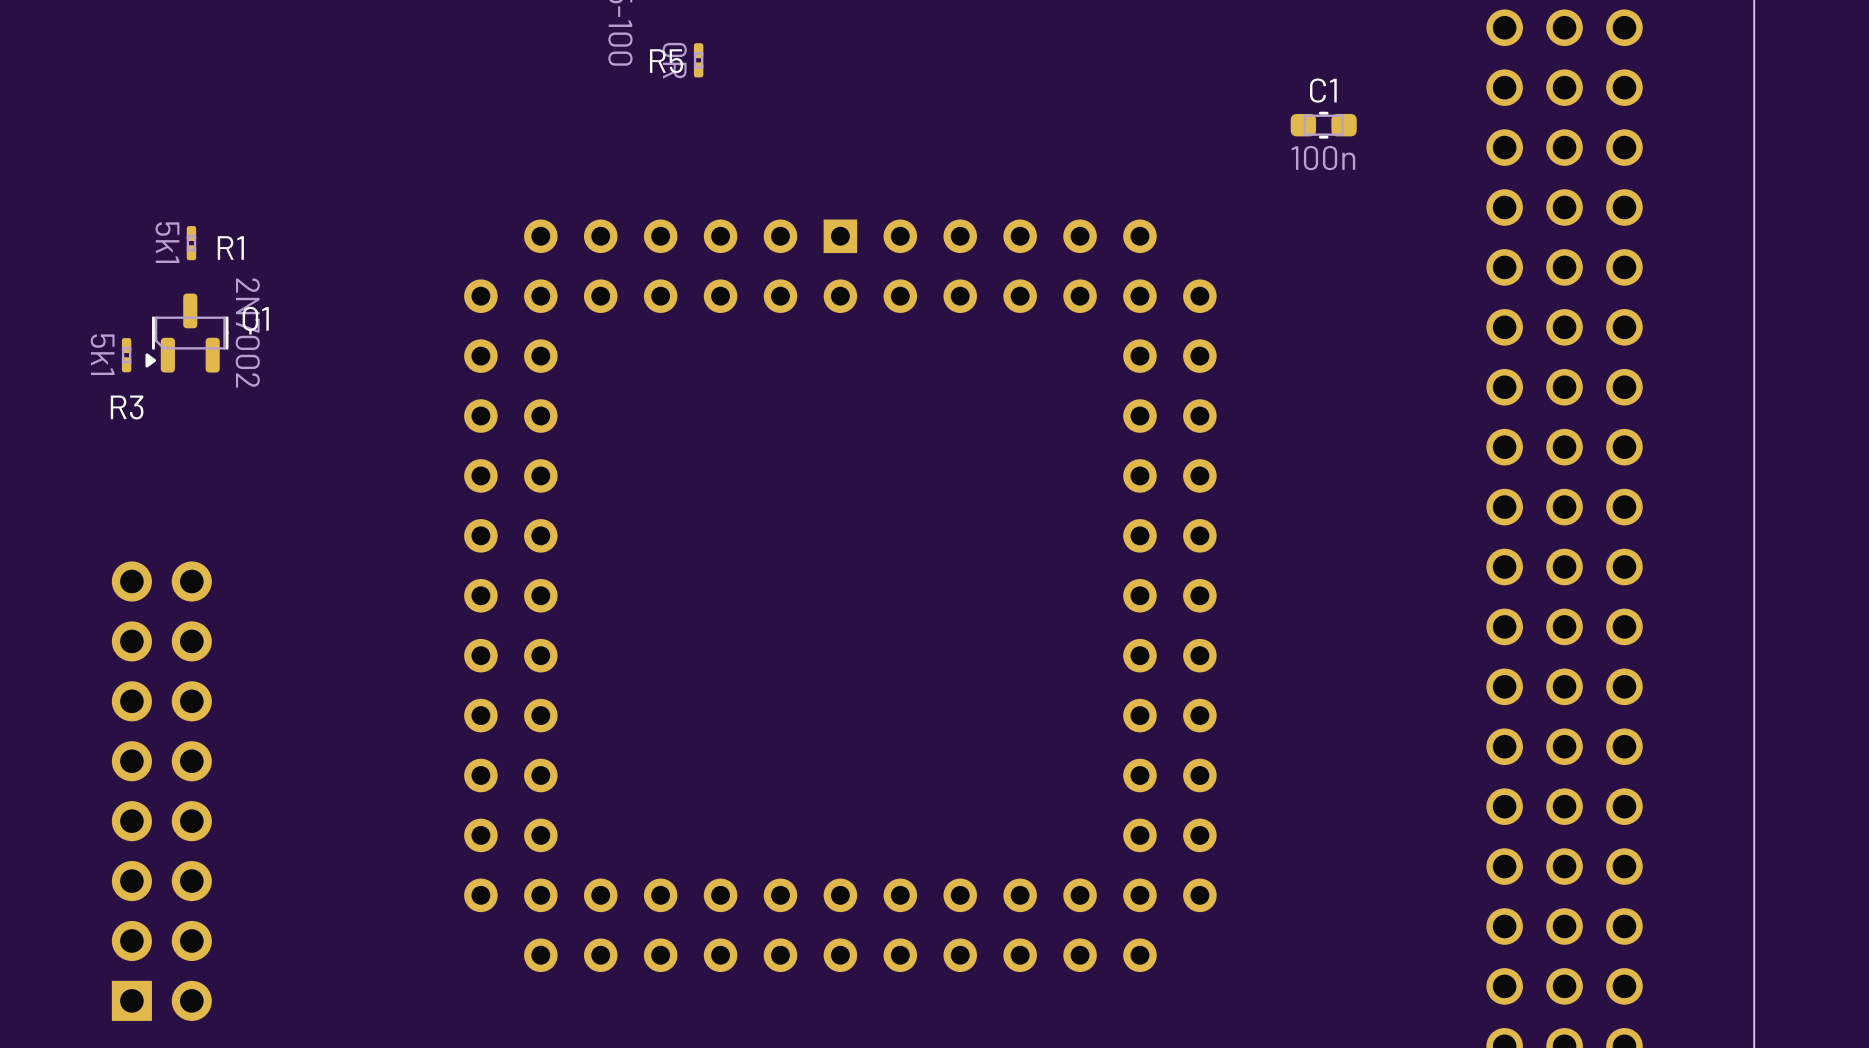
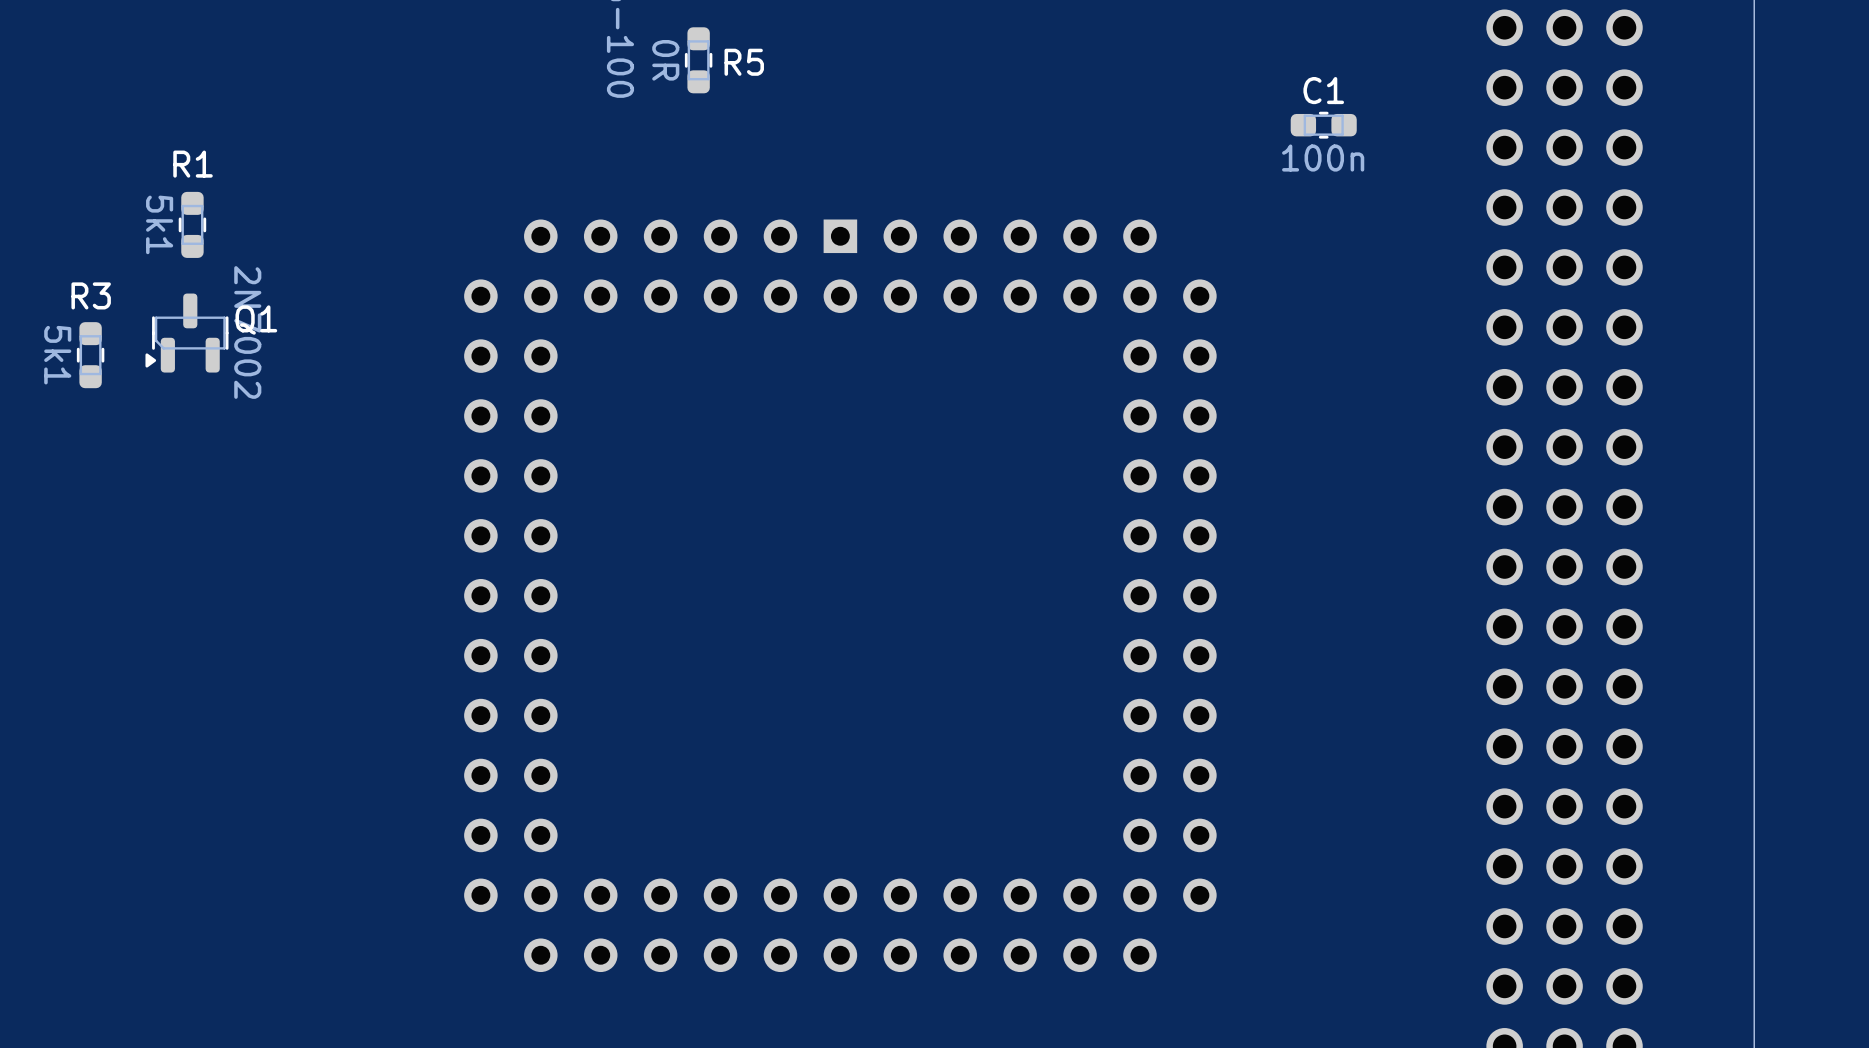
R5 footprint: [693, 43, 704, 78] -> [684, 27, 713, 94]
R5 name position: R5 (666, 61) -> R5 (744, 62)
R1 footprint: [186, 226, 197, 261] -> [178, 191, 207, 258]
R1 name position: R1 (230, 247) -> R1 (193, 164)
R3 footprint: [121, 338, 132, 373] -> [76, 322, 105, 389]
R3 name position: R3 (127, 407) -> R3 (91, 295)
part: (161, 791) -> none

